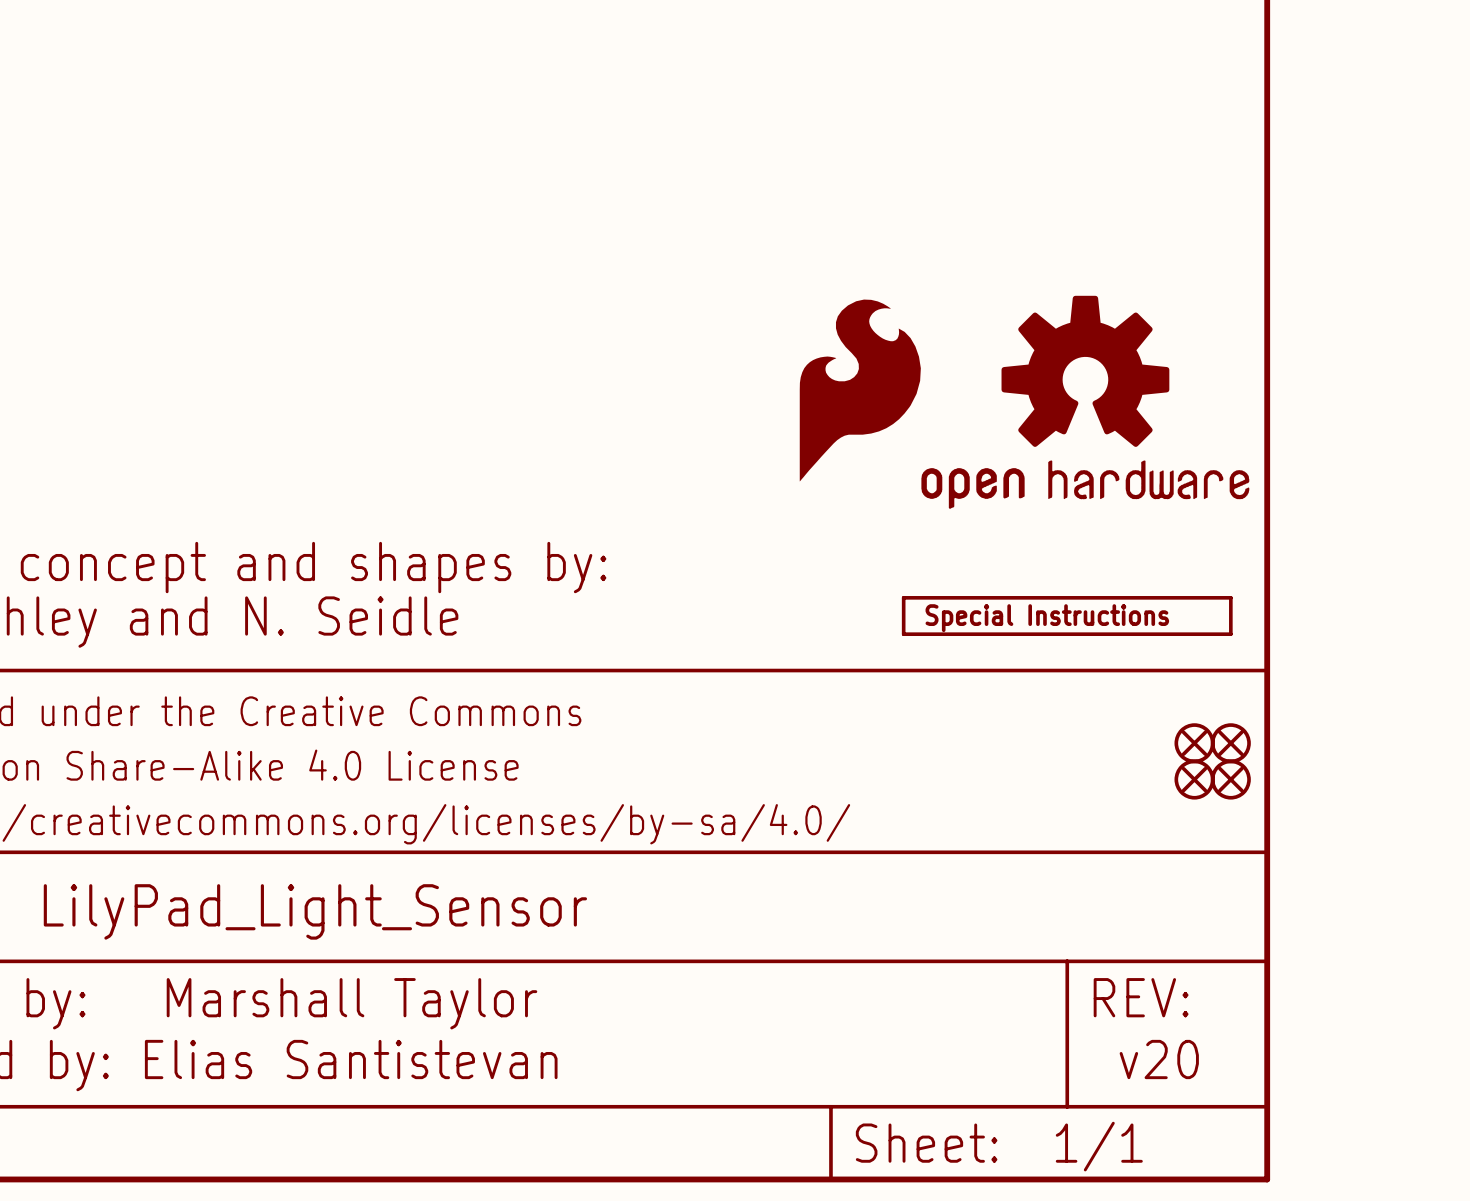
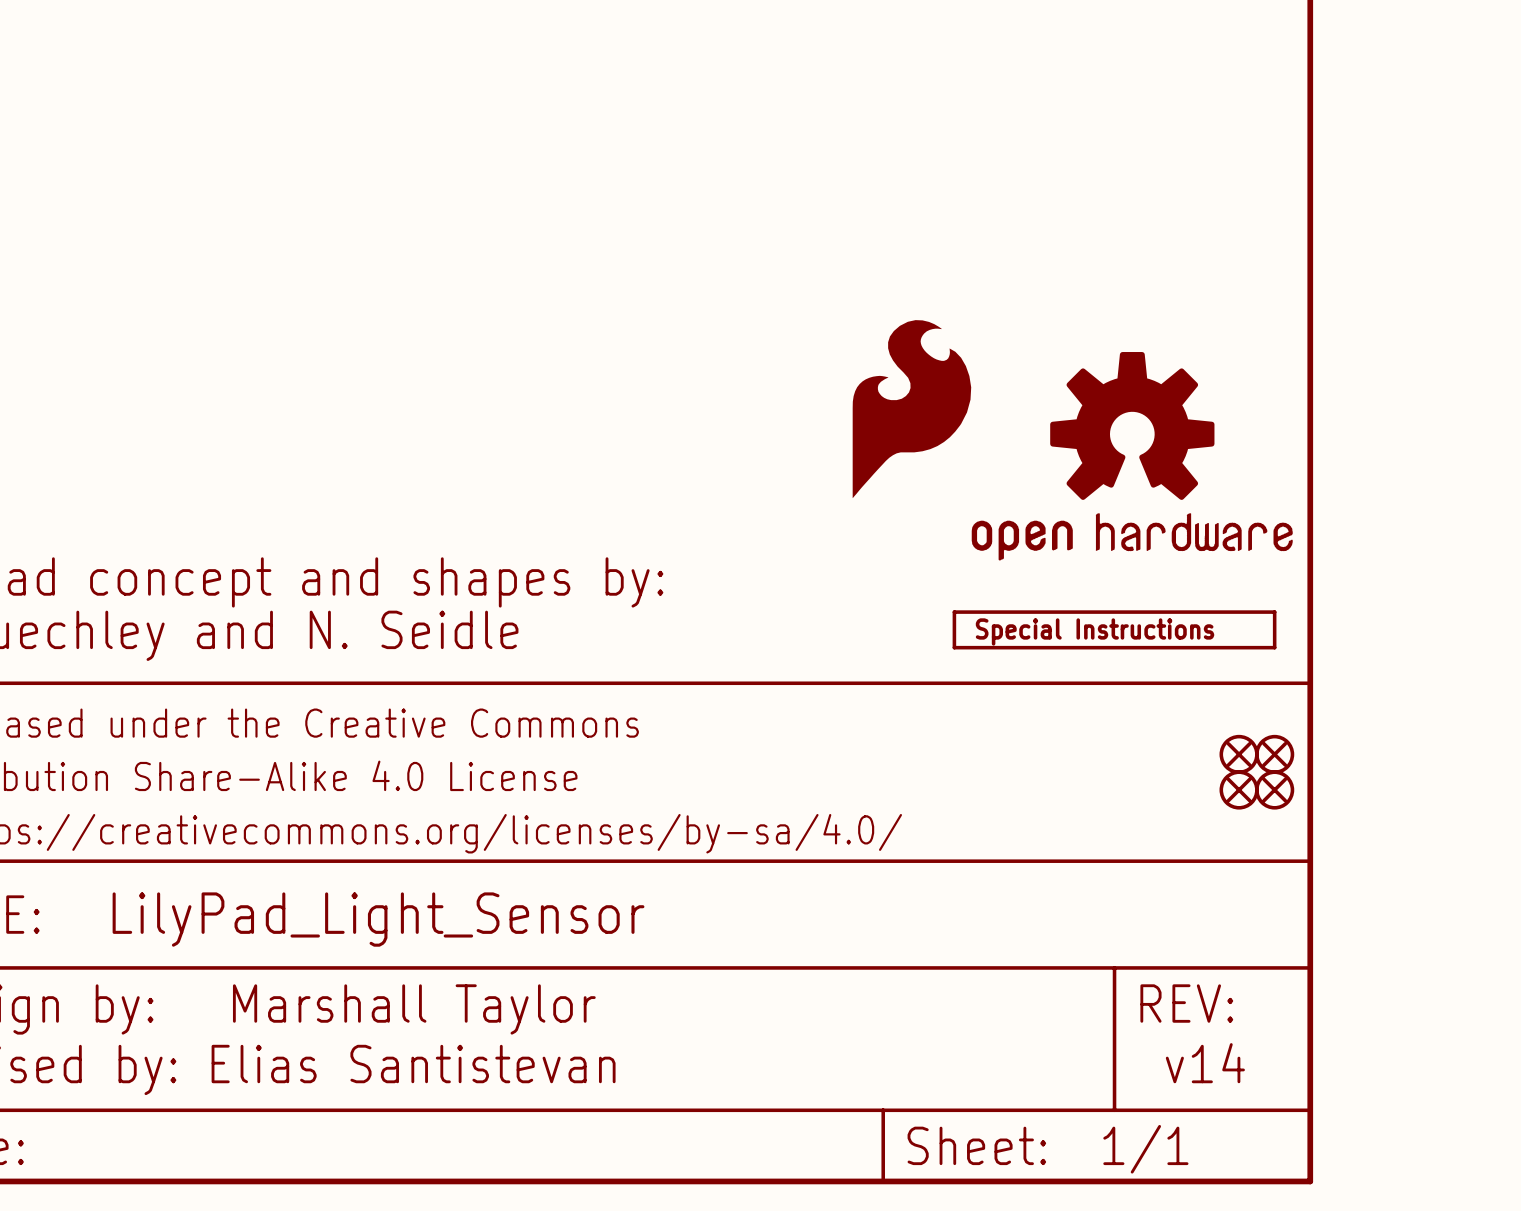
part position: (1085, 402) -> (1132, 456)
text: v20 (1159, 1059) -> v14 (1205, 1063)

